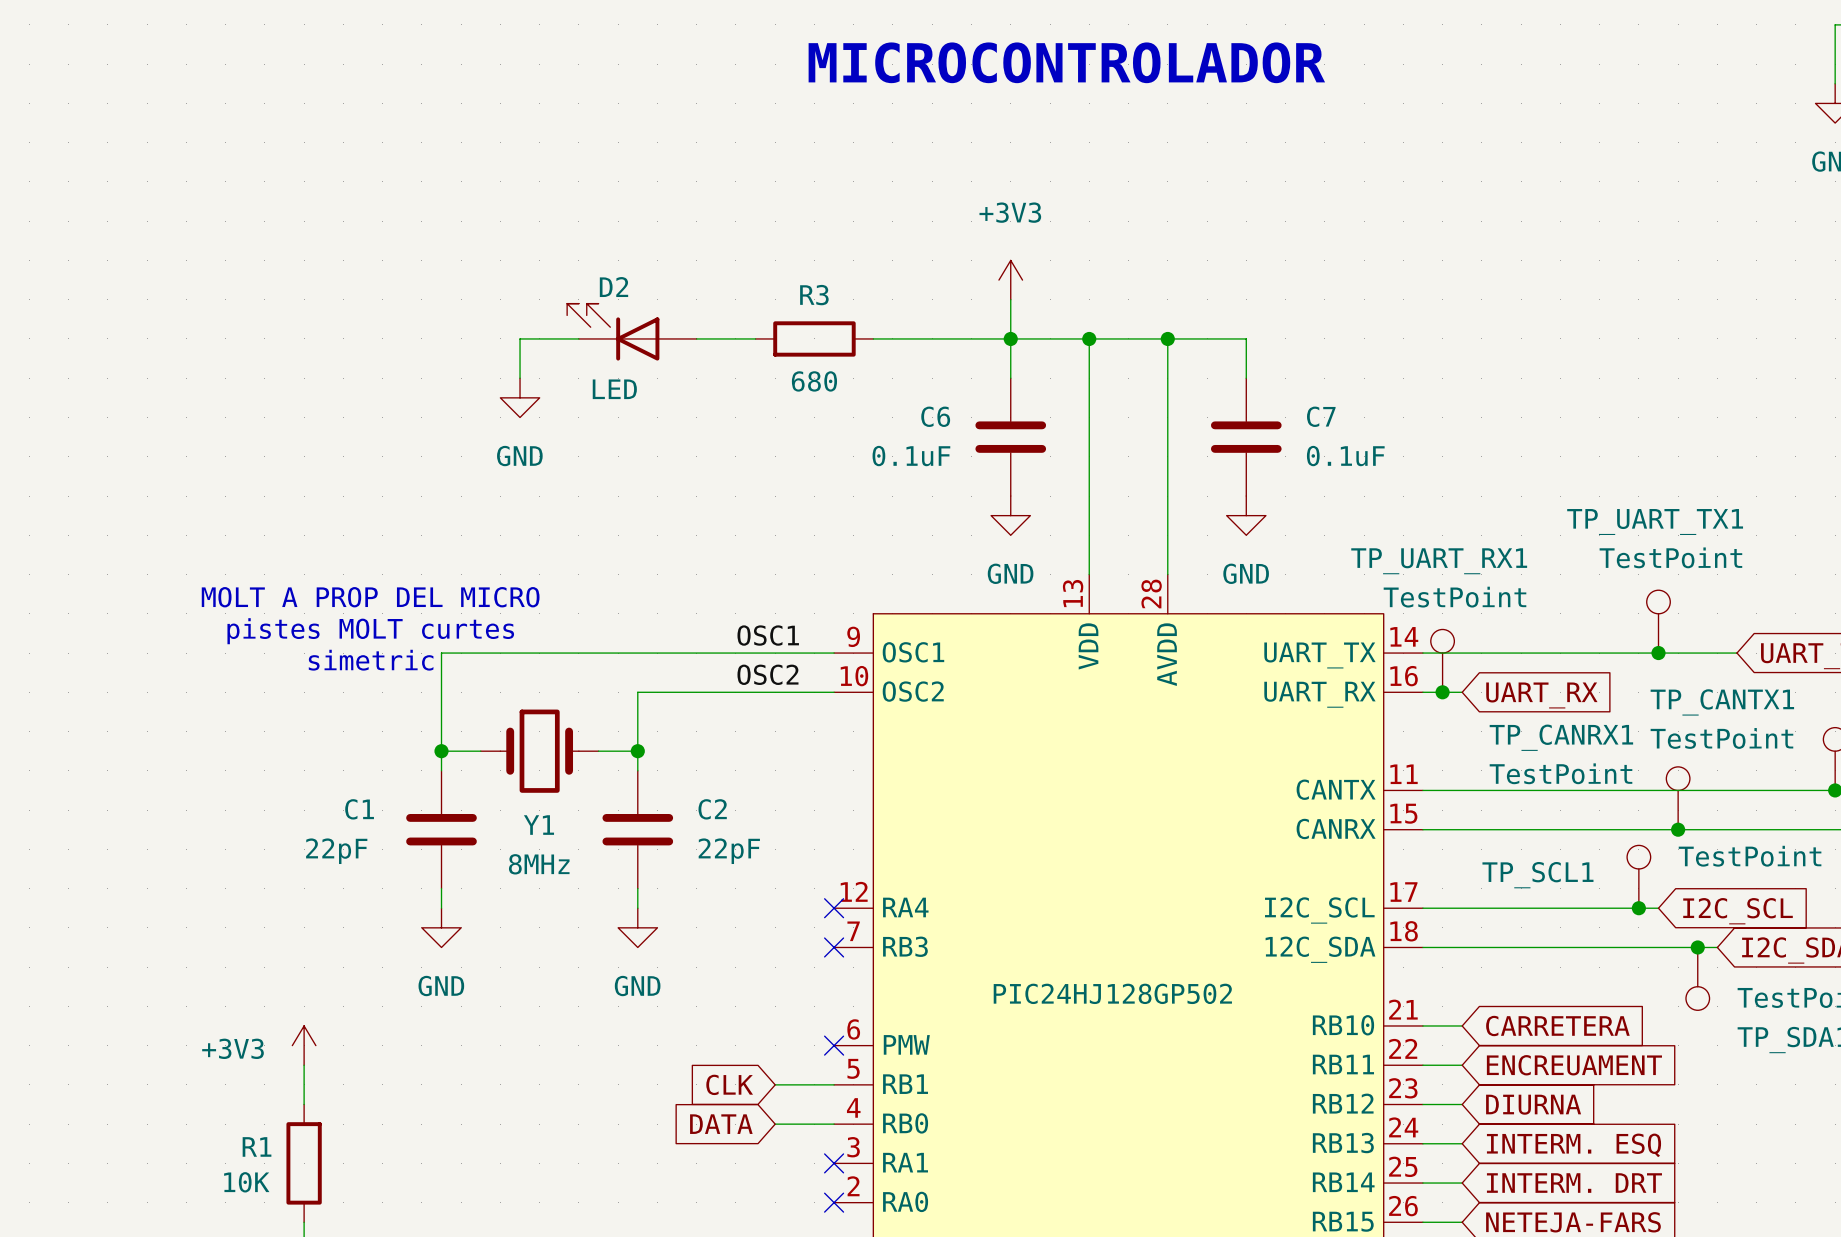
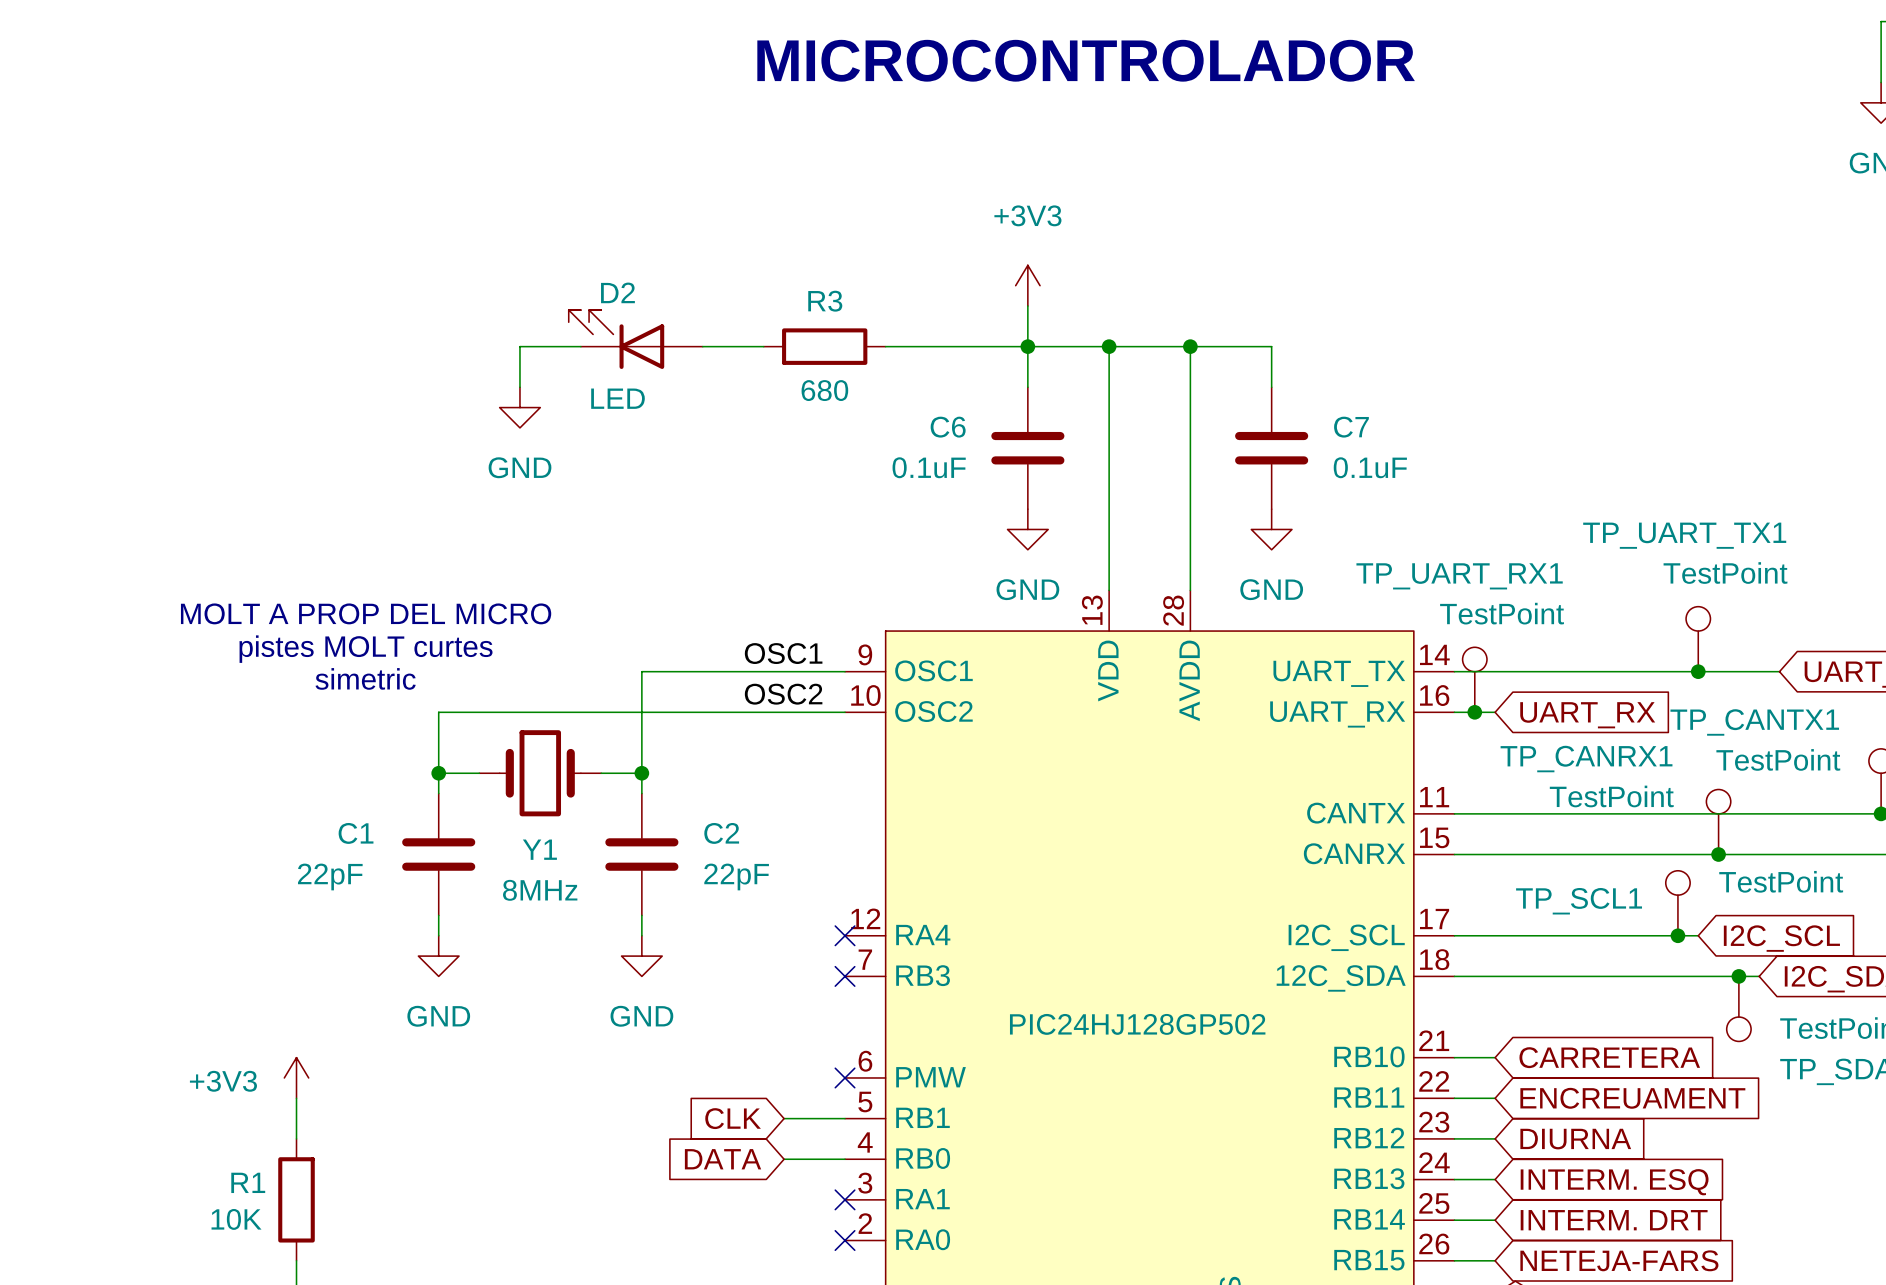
wire: (637, 653) (441, 653) (441, 692) -> (641, 671) (641, 712) (438, 712)

